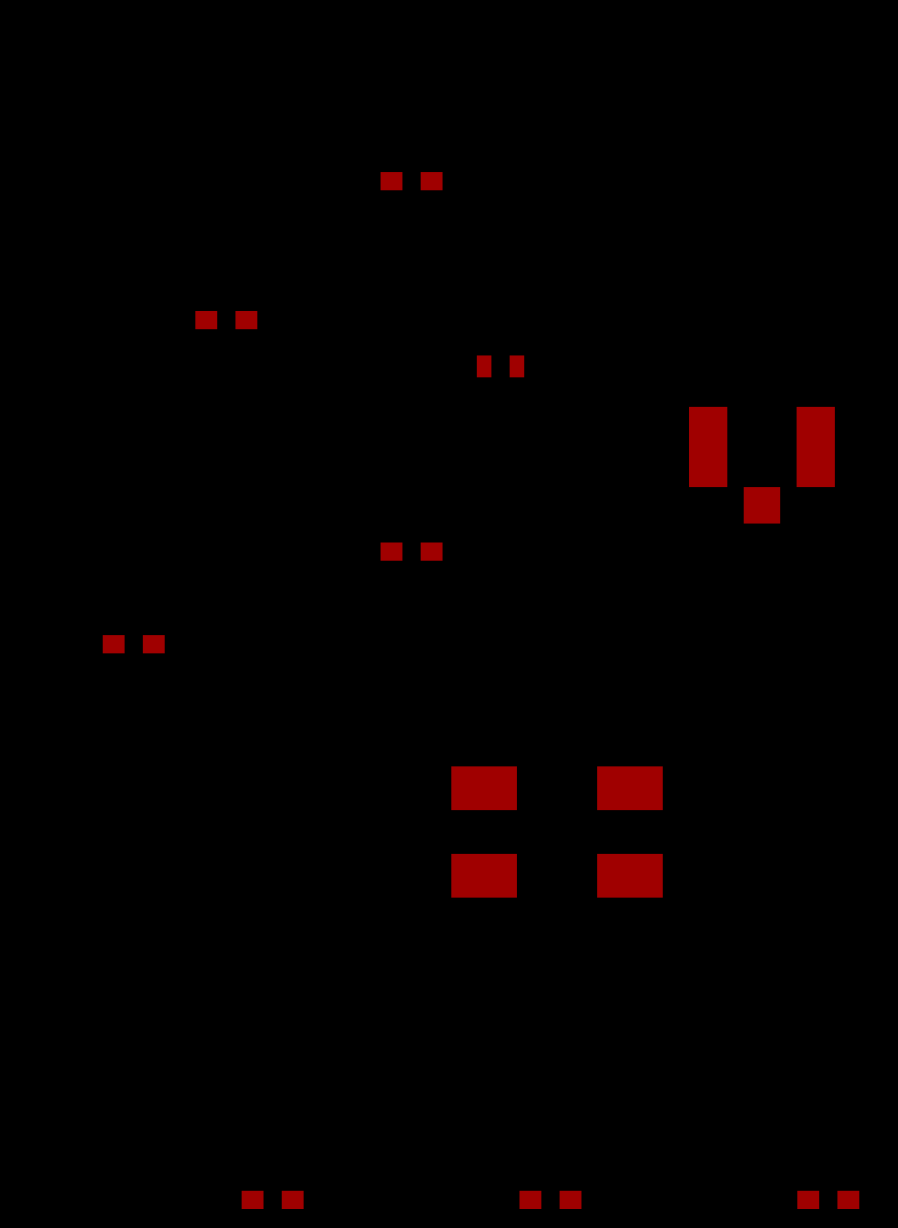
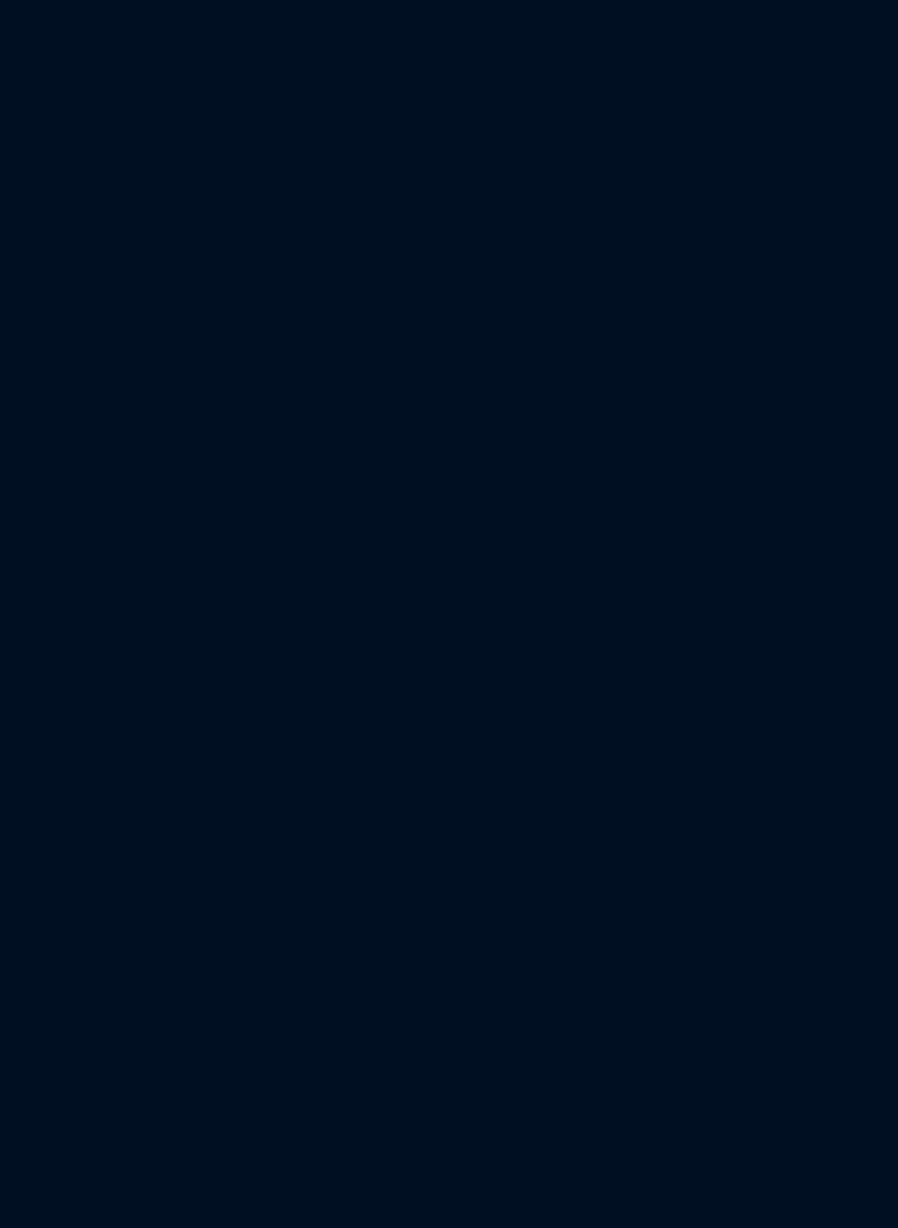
part: (411, 181) -> none
part: (226, 320) -> none
part: (500, 366) -> none
part: (761, 465) -> none
part: (411, 551) -> none
part: (133, 644) -> none
part: (557, 832) -> none
part: (272, 1199) -> none
part: (550, 1199) -> none
part: (828, 1199) -> none

